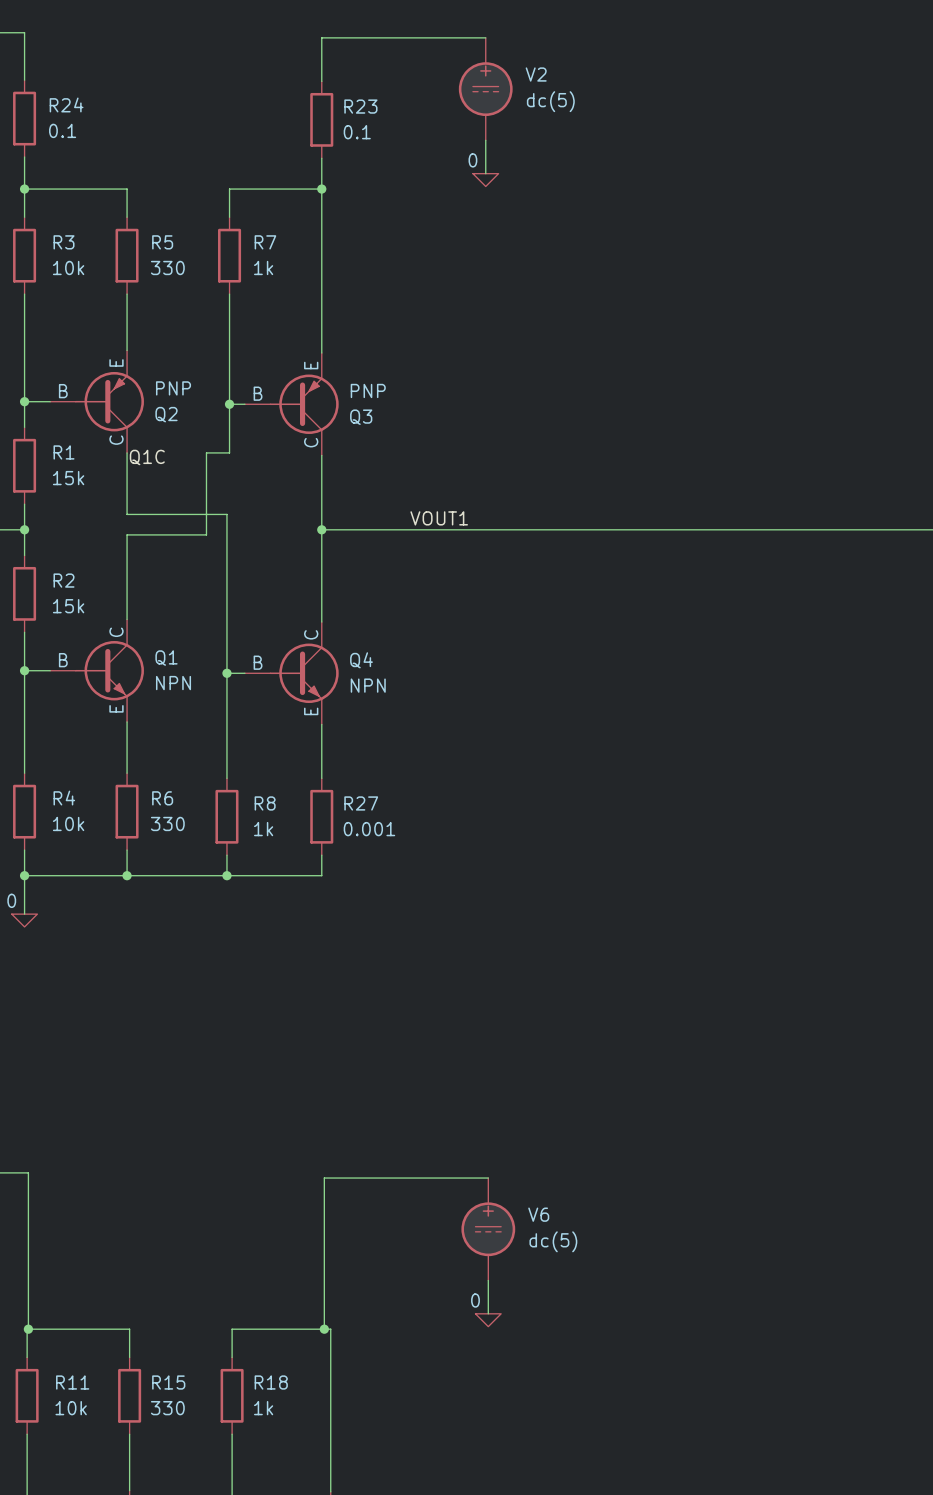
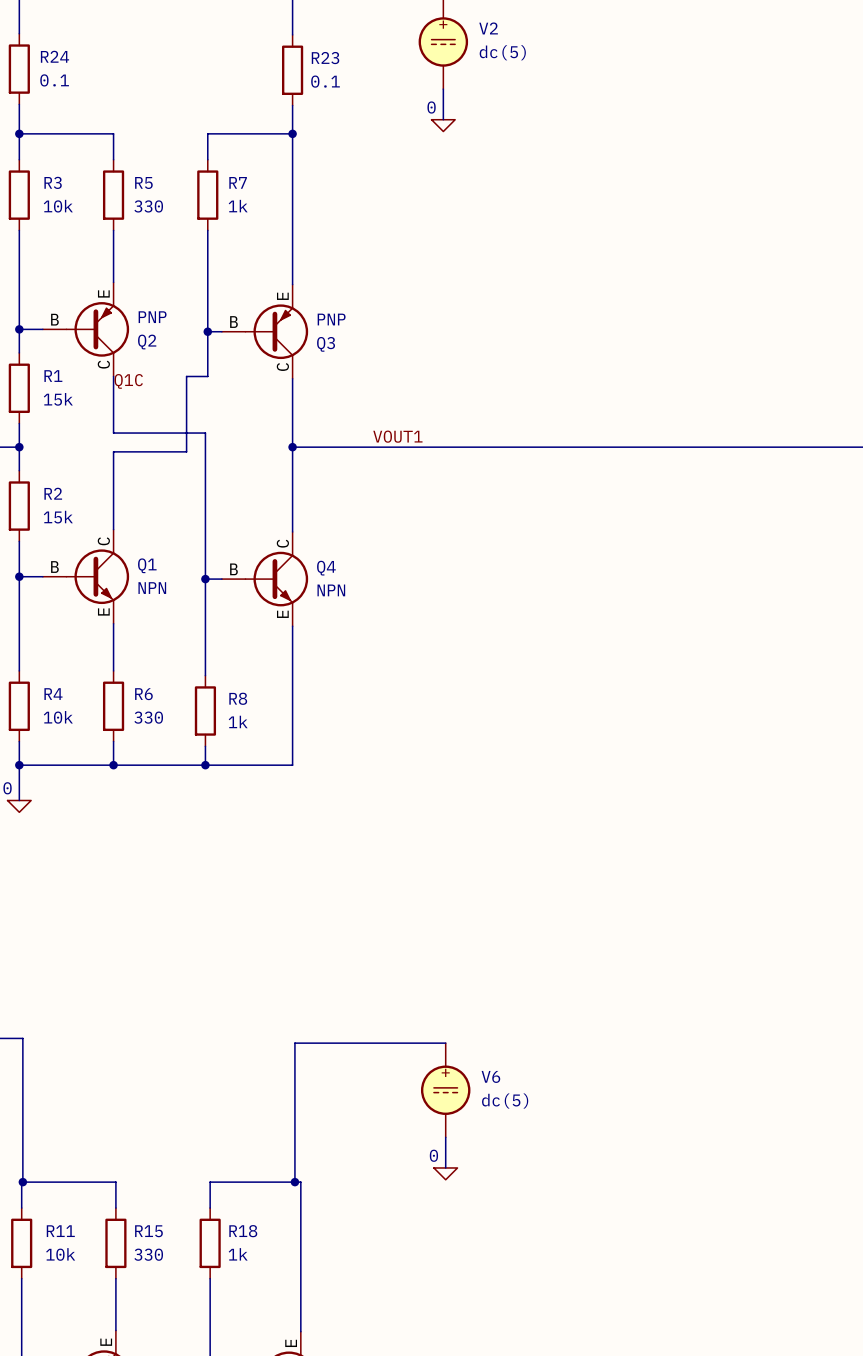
wire: none -> (292, 675) (292, 746)
R27: 0.001 (321, 816) -> none

